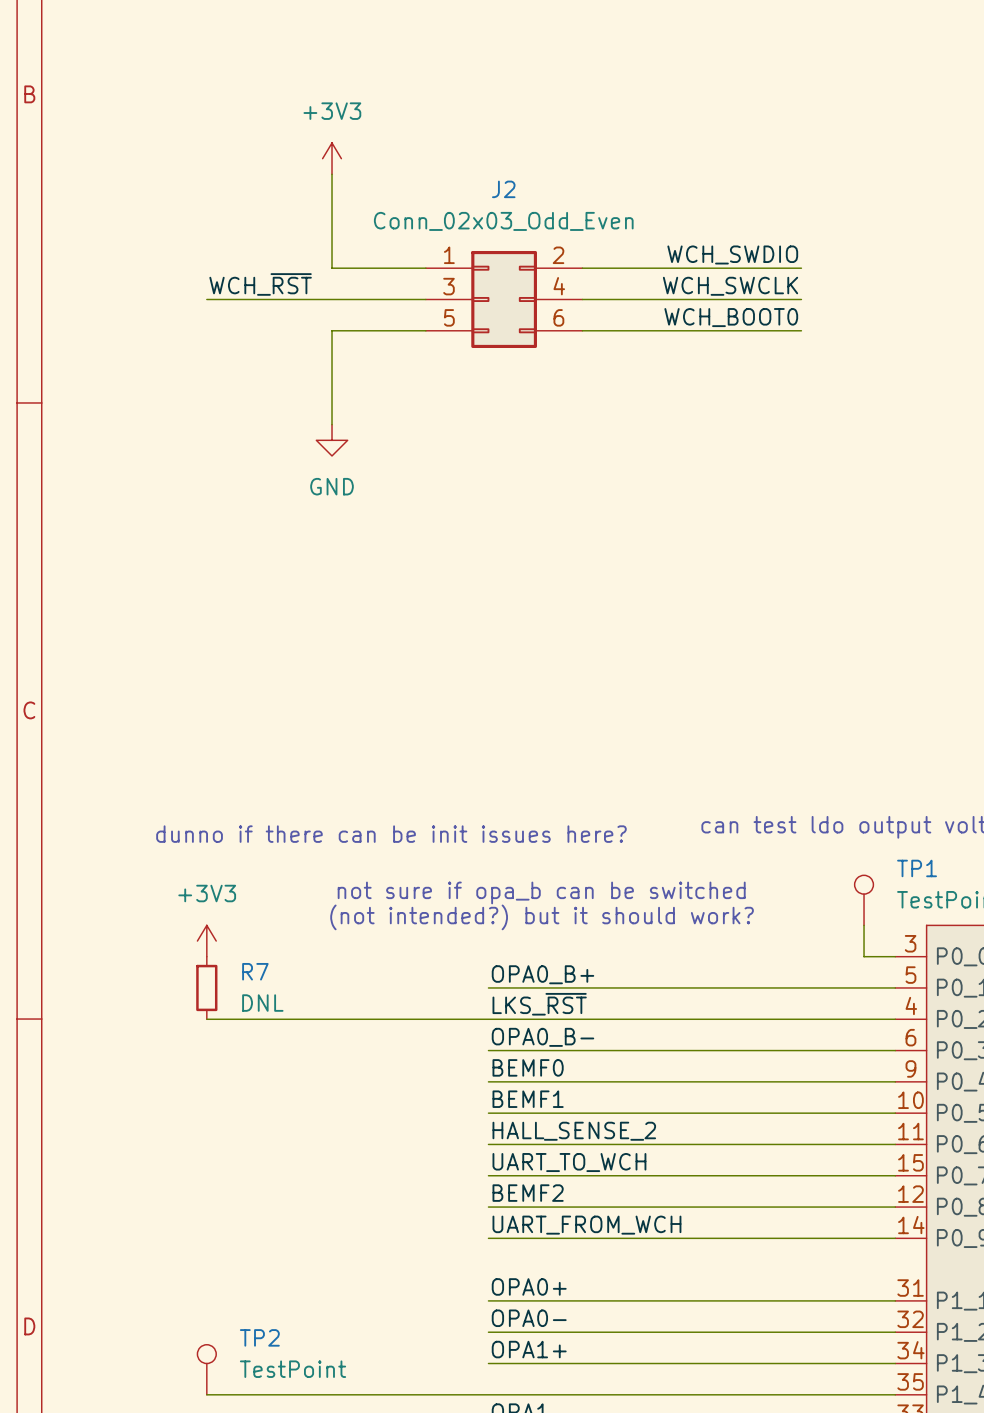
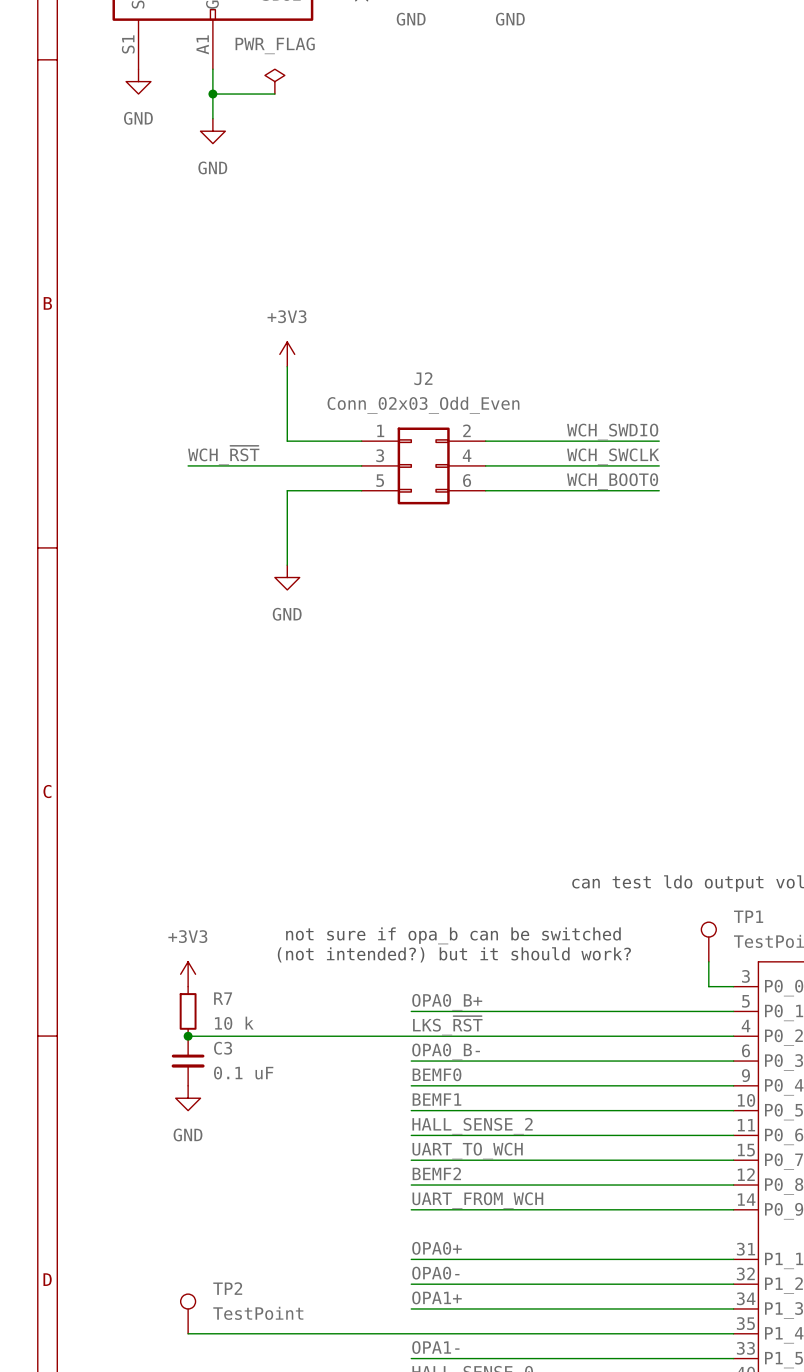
text: dunno if there can be init issues here? (391, 834) -> none
R7 value: DNL (262, 1003) -> 10 k (234, 1023)
junction: none -> (188, 1036)
C3: none -> 0.1 uF (188, 1061)
power symbol: none -> GND (188, 1098)

